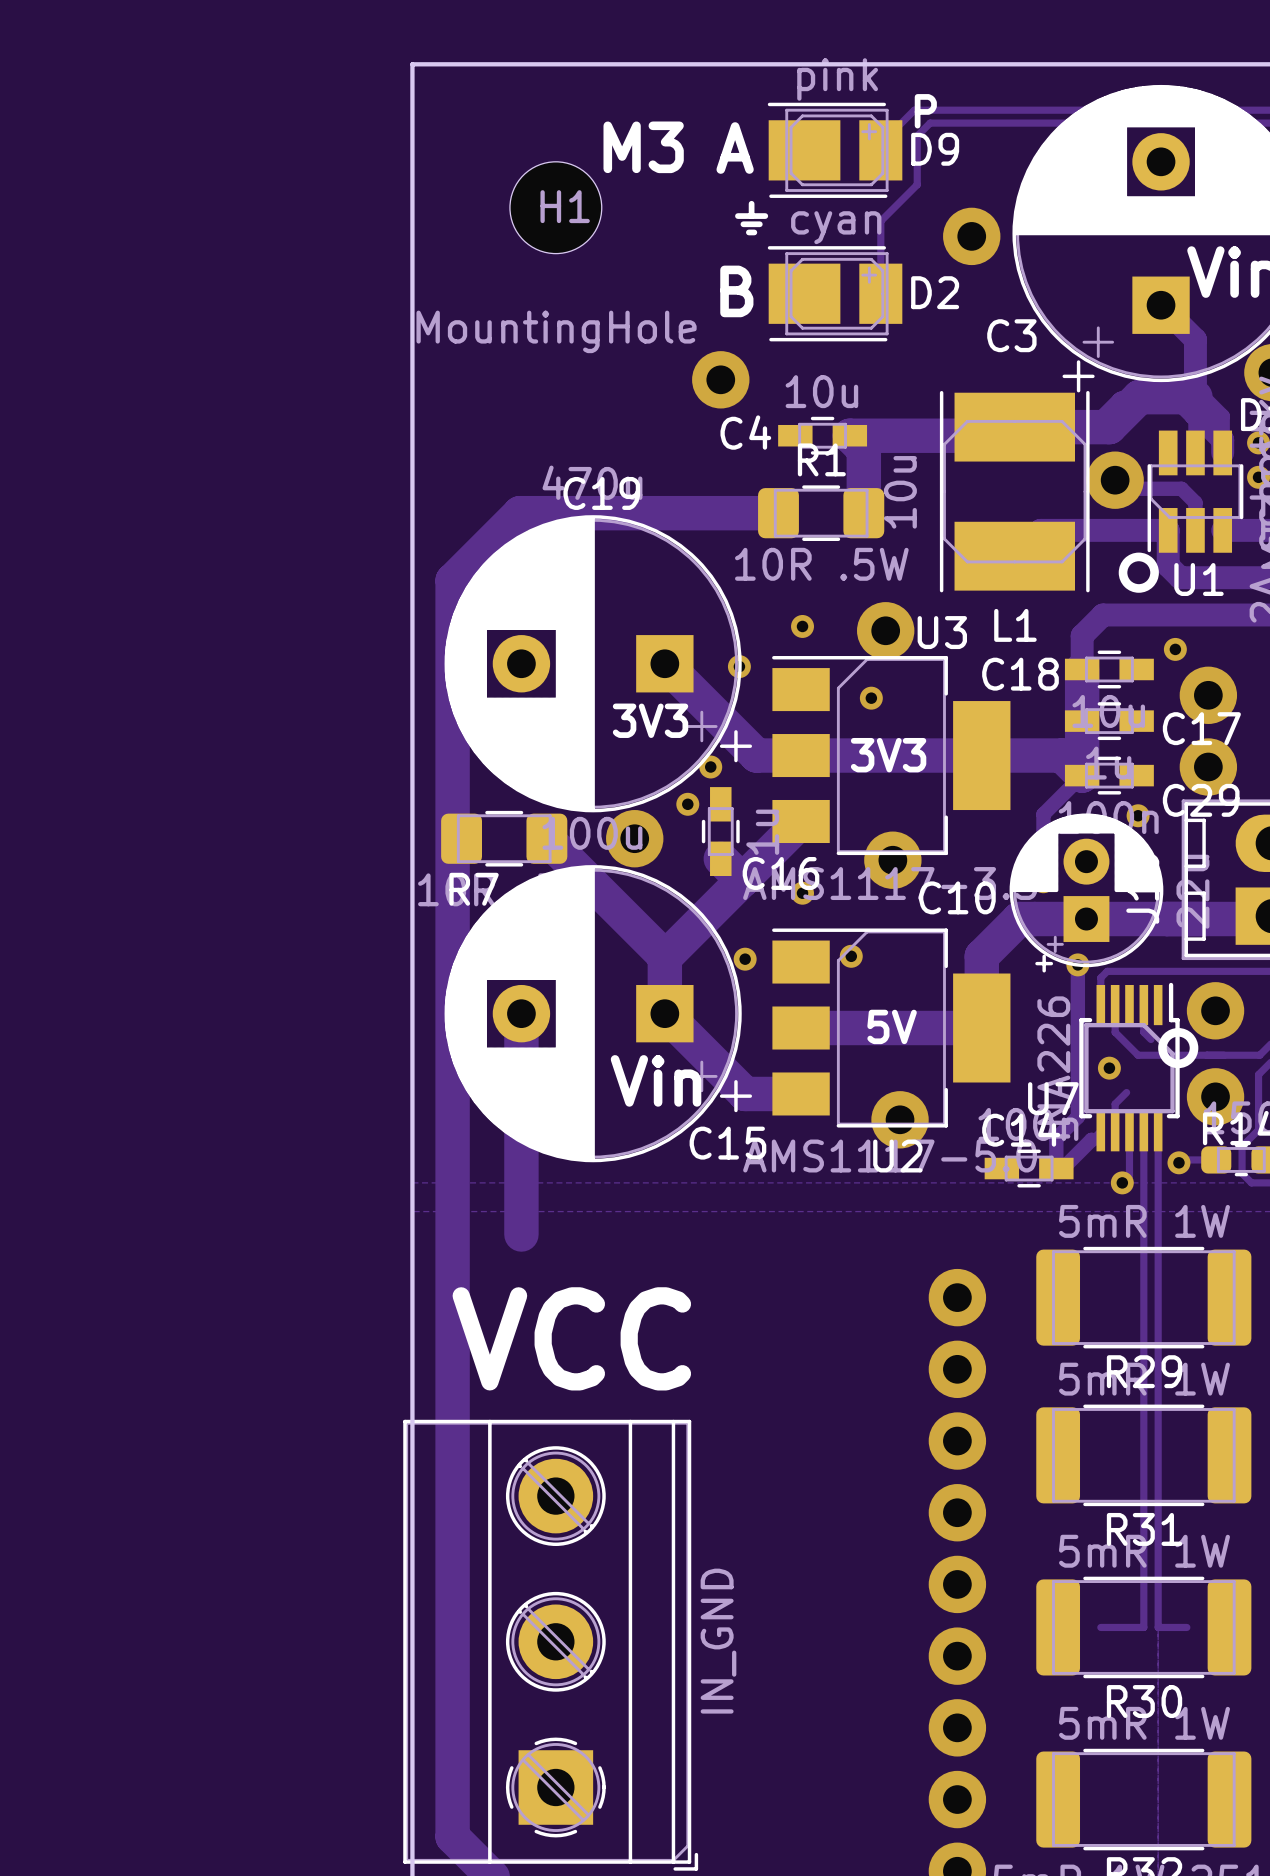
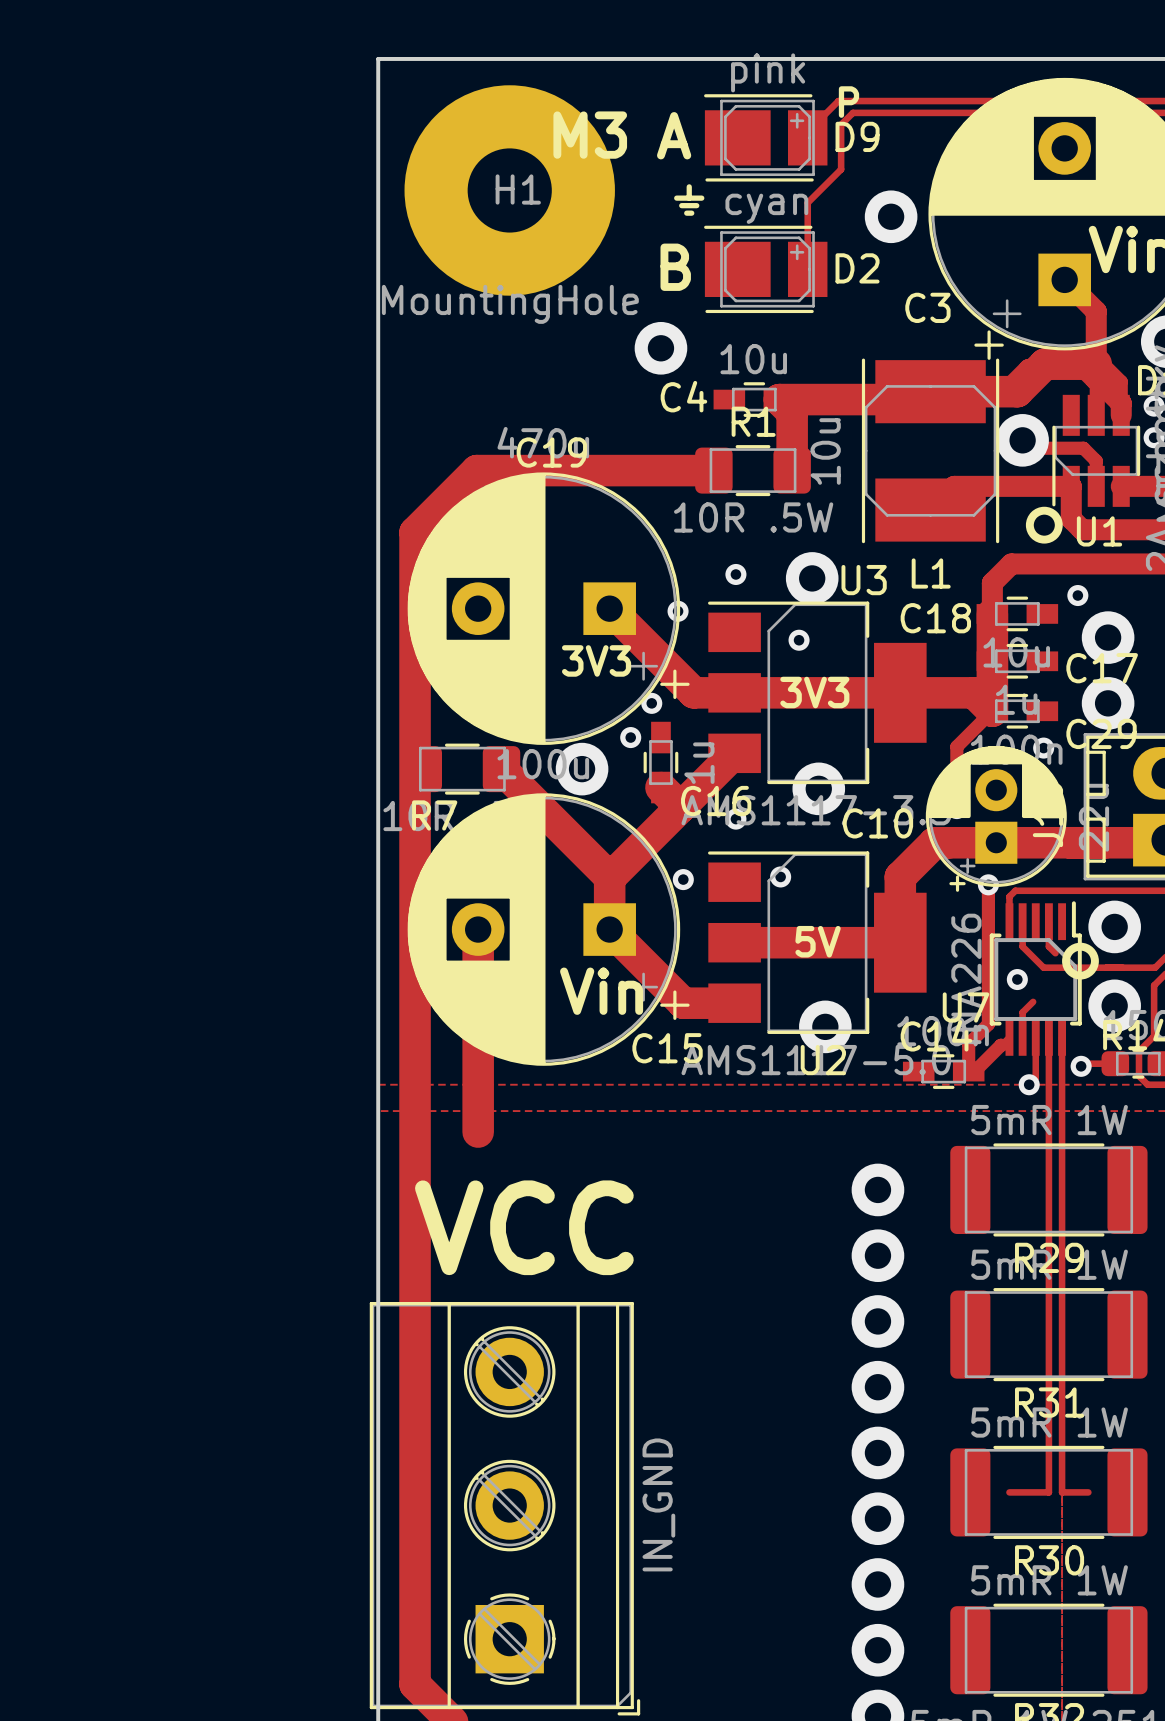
H1 footprint: [509, 161, 602, 254] -> [404, 85, 615, 296]

